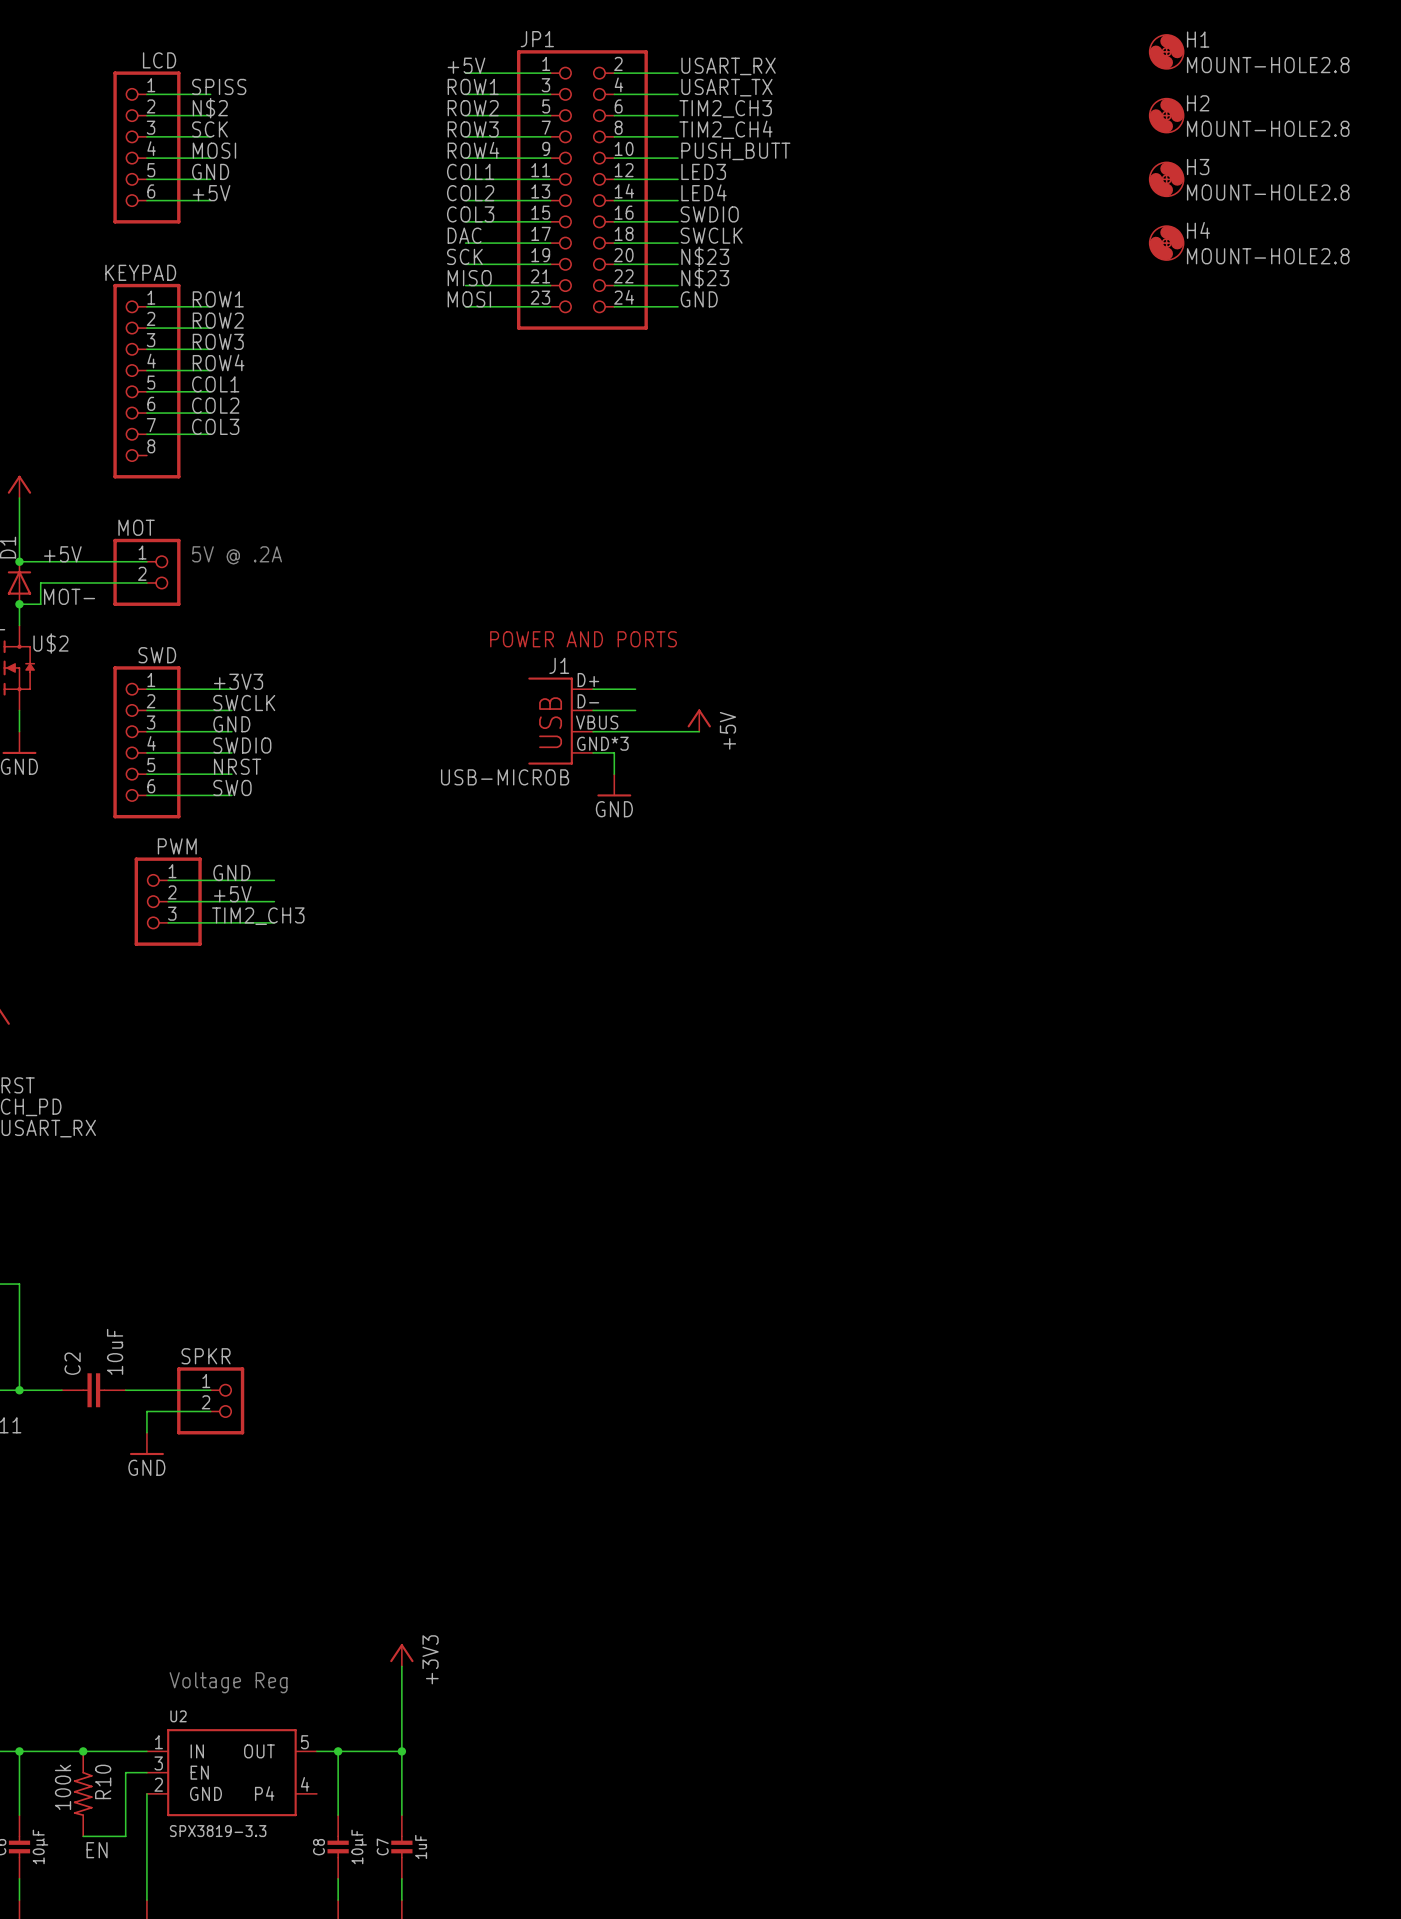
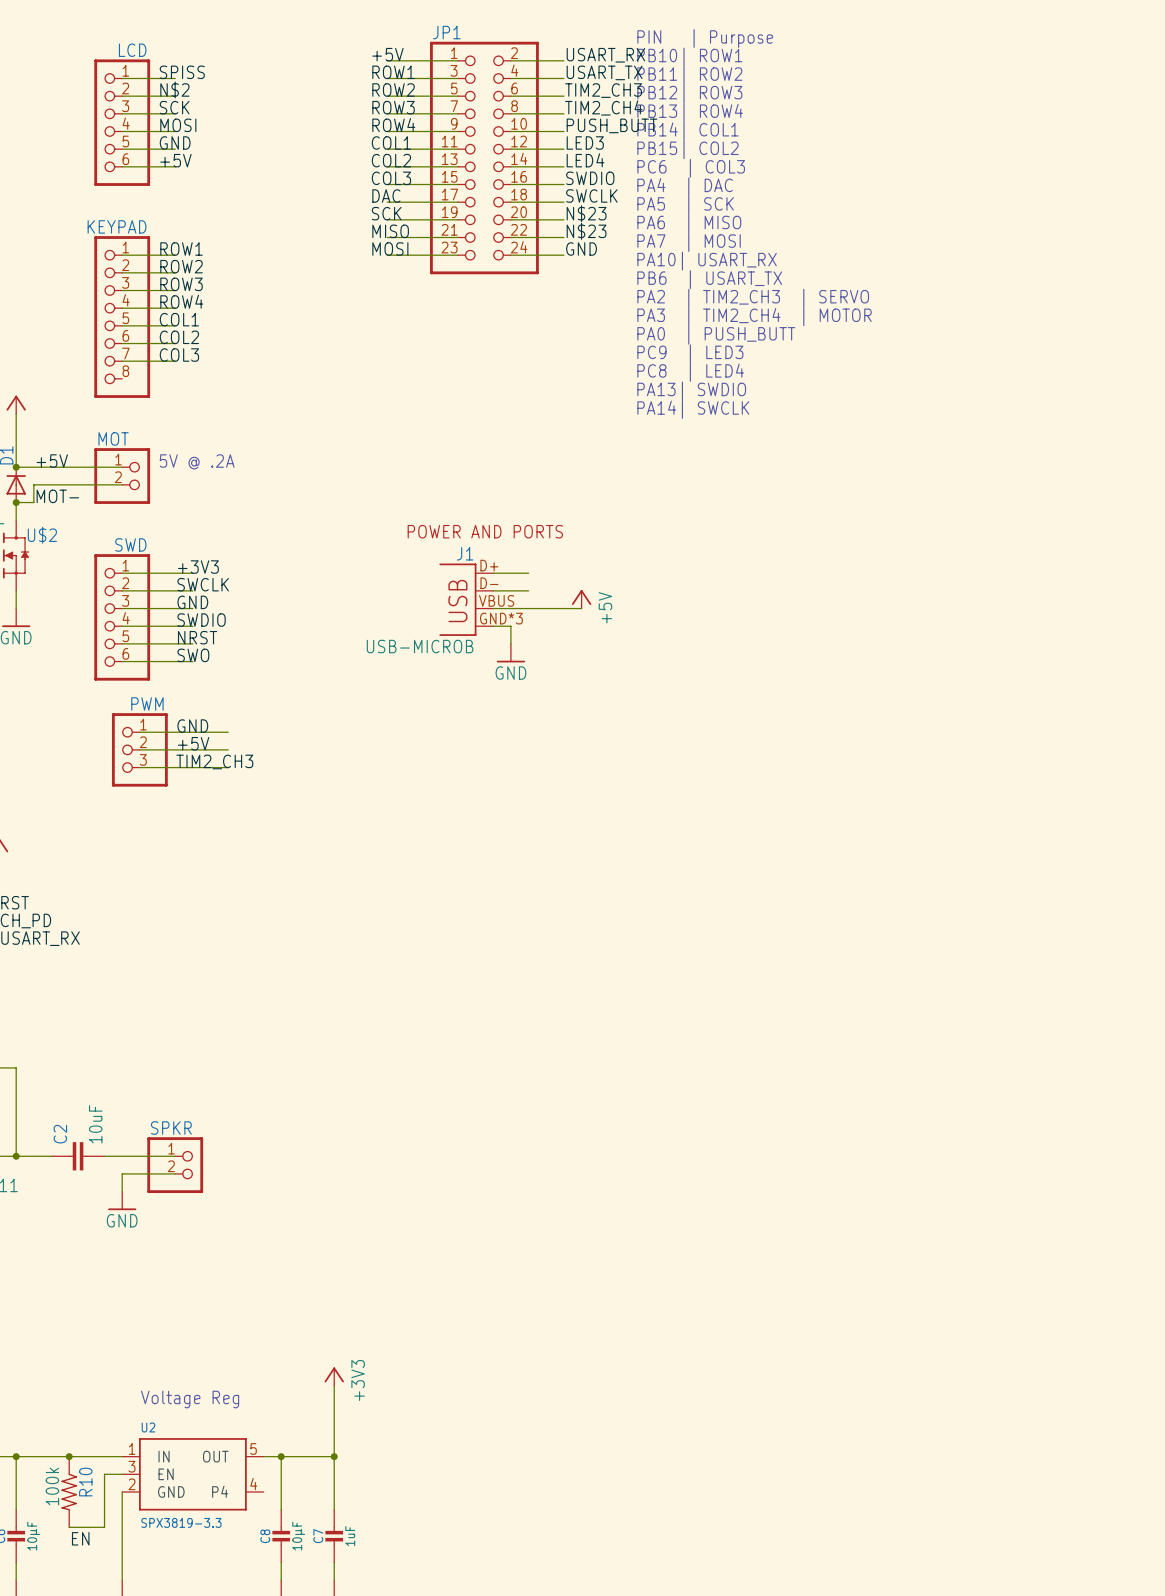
text: none -> PIN | Purpose (705, 38)
H1: MOUNT-HOLE2.8 (1166, 51) -> none
text: none -> PB10| ROW1 (689, 57)
text: none -> PB11| ROW2 (689, 75)
text: none -> PB12| ROW3 (689, 94)
H2: MOUNT-HOLE2.8 (1166, 115) -> none
text: none -> PB13| ROW4 (690, 112)
text: none -> PB14| COL1 (687, 131)
H3: MOUNT-HOLE2.8 (1166, 179) -> none
text: none -> PB15| COL2 (687, 149)
text: none -> PC6 | COL3 (691, 168)
text: none -> PA4 | DAC (685, 186)
H4: MOUNT-HOLE2.8 (1166, 243) -> none
text: none -> PA5 | SCK (685, 205)
text: none -> PA6 | MISO (689, 223)
text: none -> PA7 | MOSI (689, 242)
text: none -> PA10| USART_RX (707, 261)
text: none -> PB6 | USART_TX (709, 279)
text: none -> PA2 | TIM2_CH3 | SERVO (753, 298)
text: none -> PA3 | TIM2_CH4 | MOTOR (754, 316)
text: none -> PA0 | PUSH_BUTT (716, 335)
text: none -> PC9 | LED3 (690, 353)
text: none -> PC8 | LED4 (690, 372)
text: none -> PA13| SWDIO (691, 390)
text: none -> PA14| SWCLK (693, 409)

